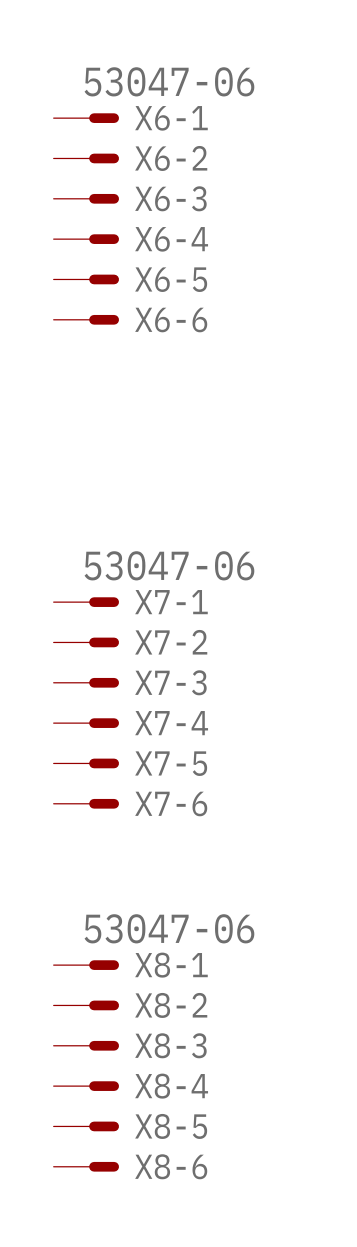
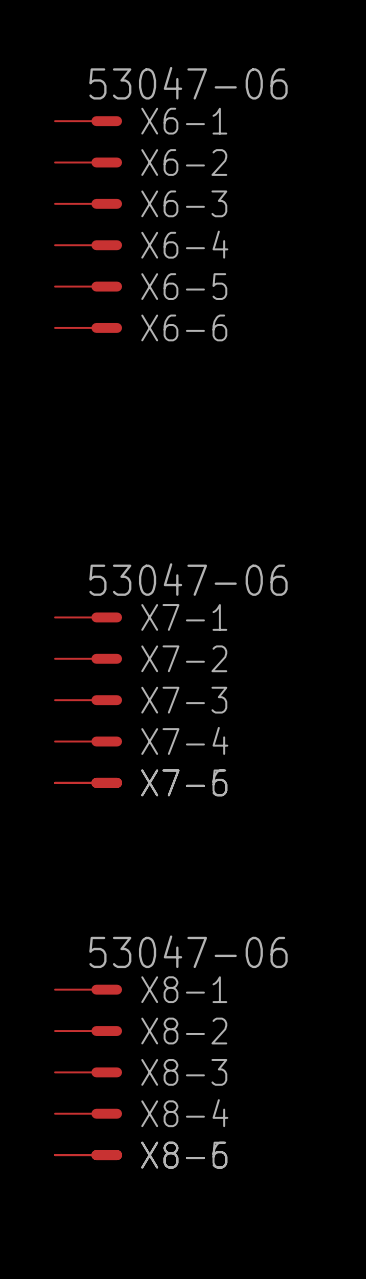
X7-6 position: (86, 803) -> (88, 782)
X8-6 position: (86, 1166) -> (88, 1155)

